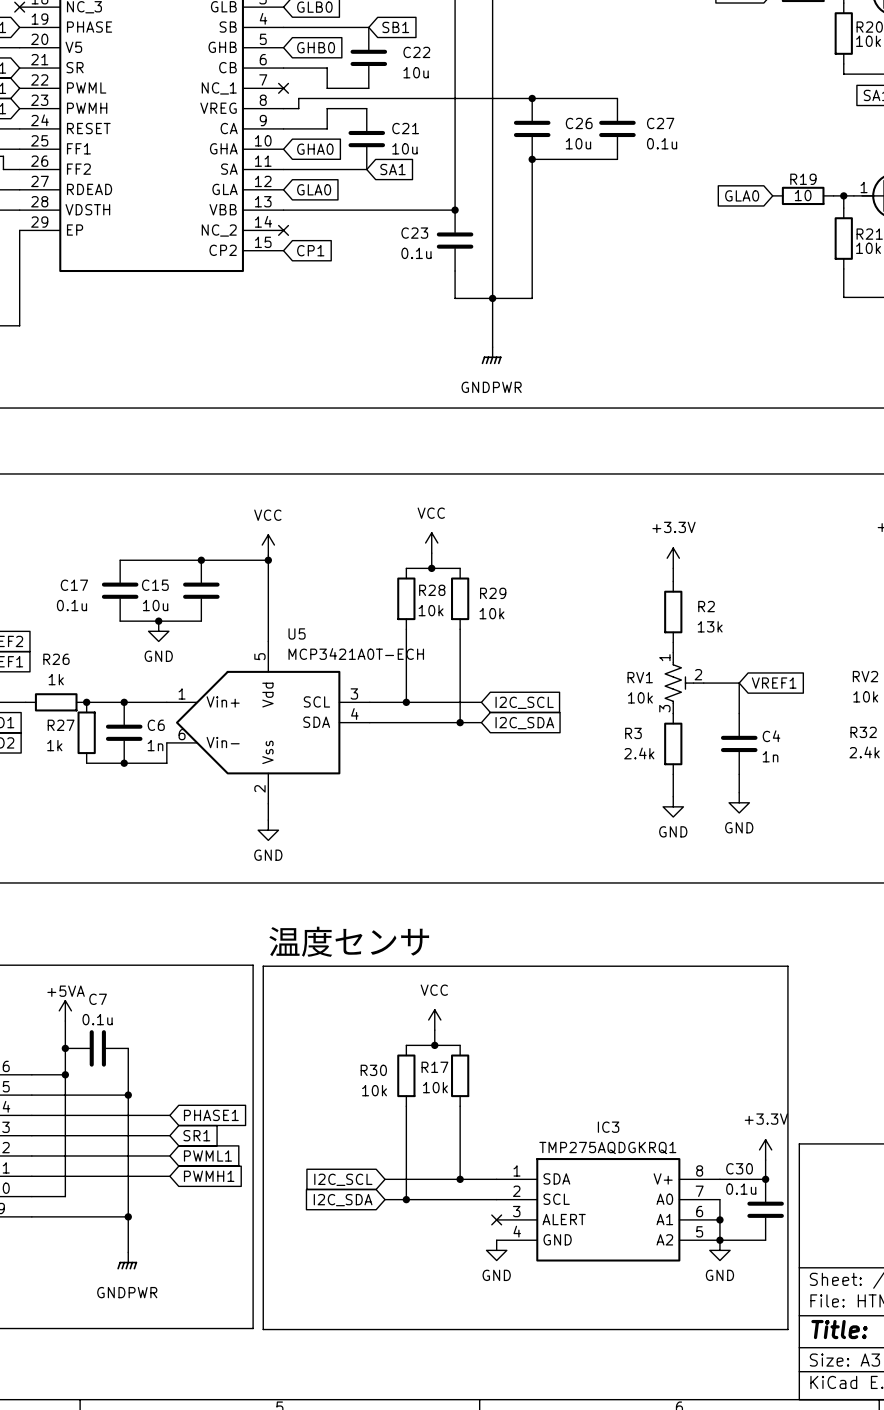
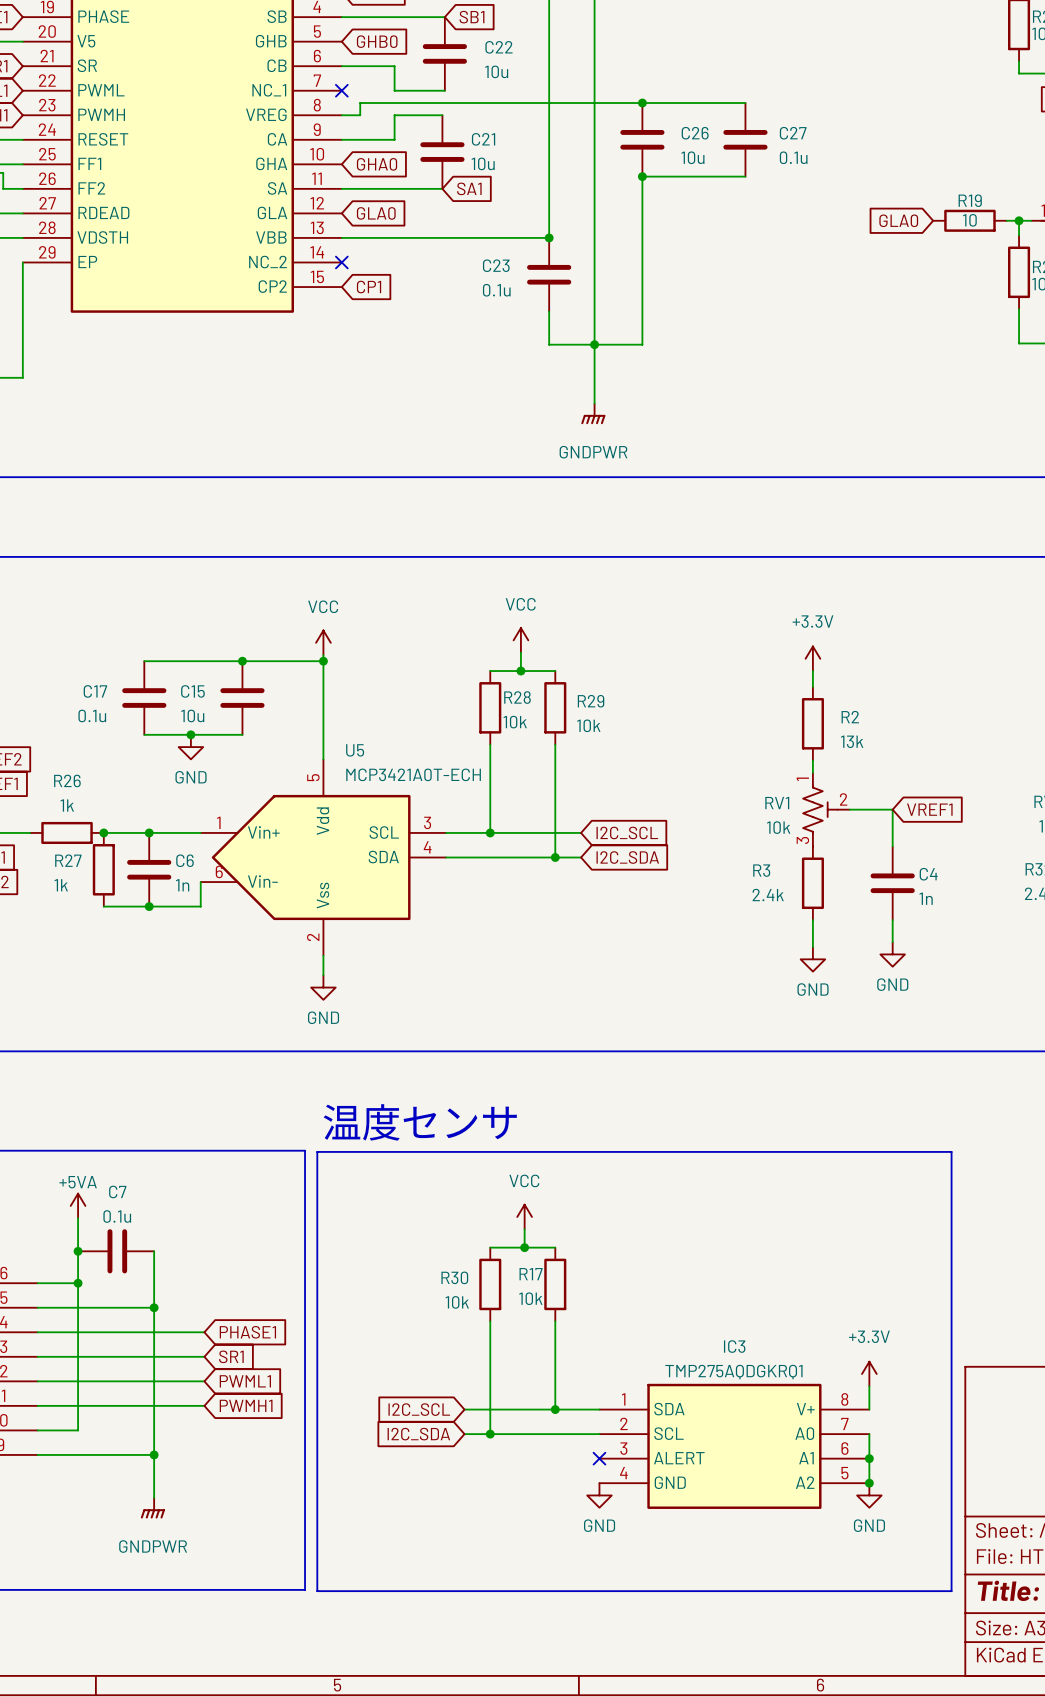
power symbol position: +3.3V (765, 1149) -> +3.3V (869, 1374)
wire: (765, 1160) (765, 1179) (719, 1179) -> (869, 1386) (869, 1409)
junction: (765, 1179) -> none
C30: 0.1u (765, 1209) -> none
wire: (719, 1240) (765, 1240) -> none

